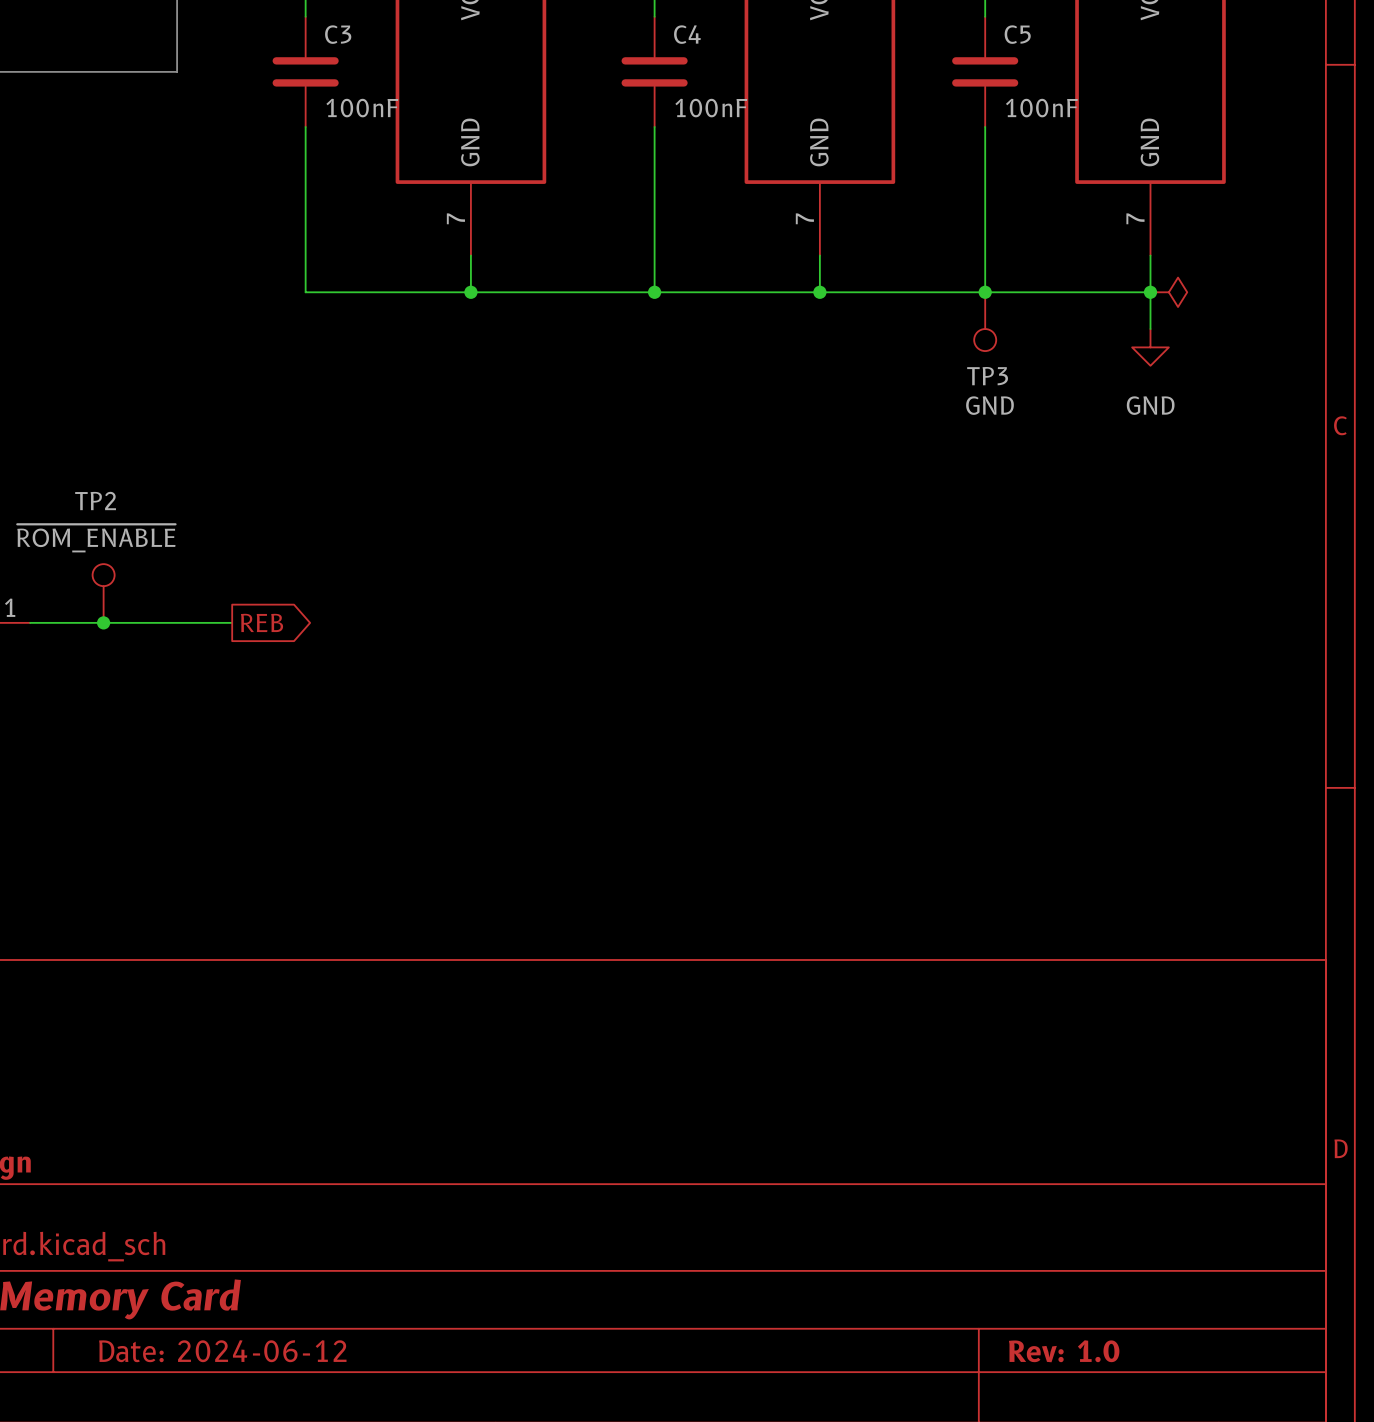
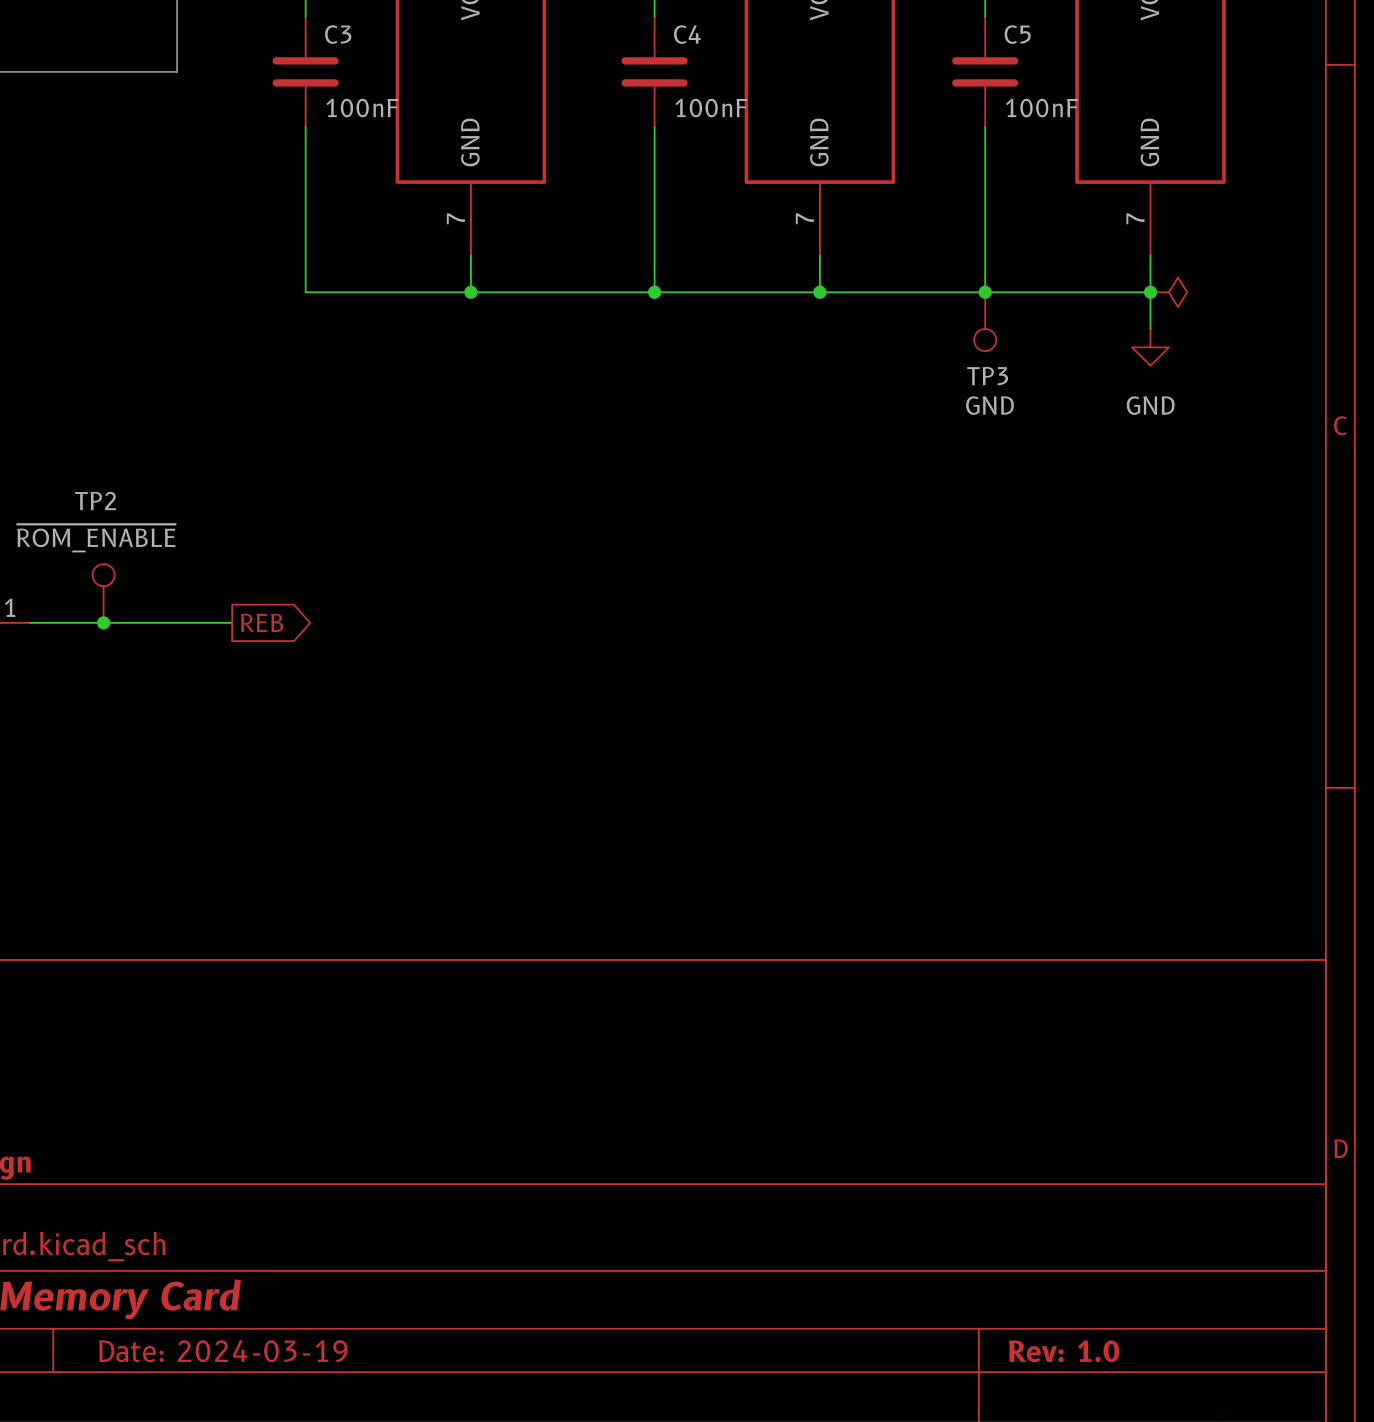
title block: Date: 2024-06-12 (222, 1351) -> Date: 2024-03-19 (223, 1351)

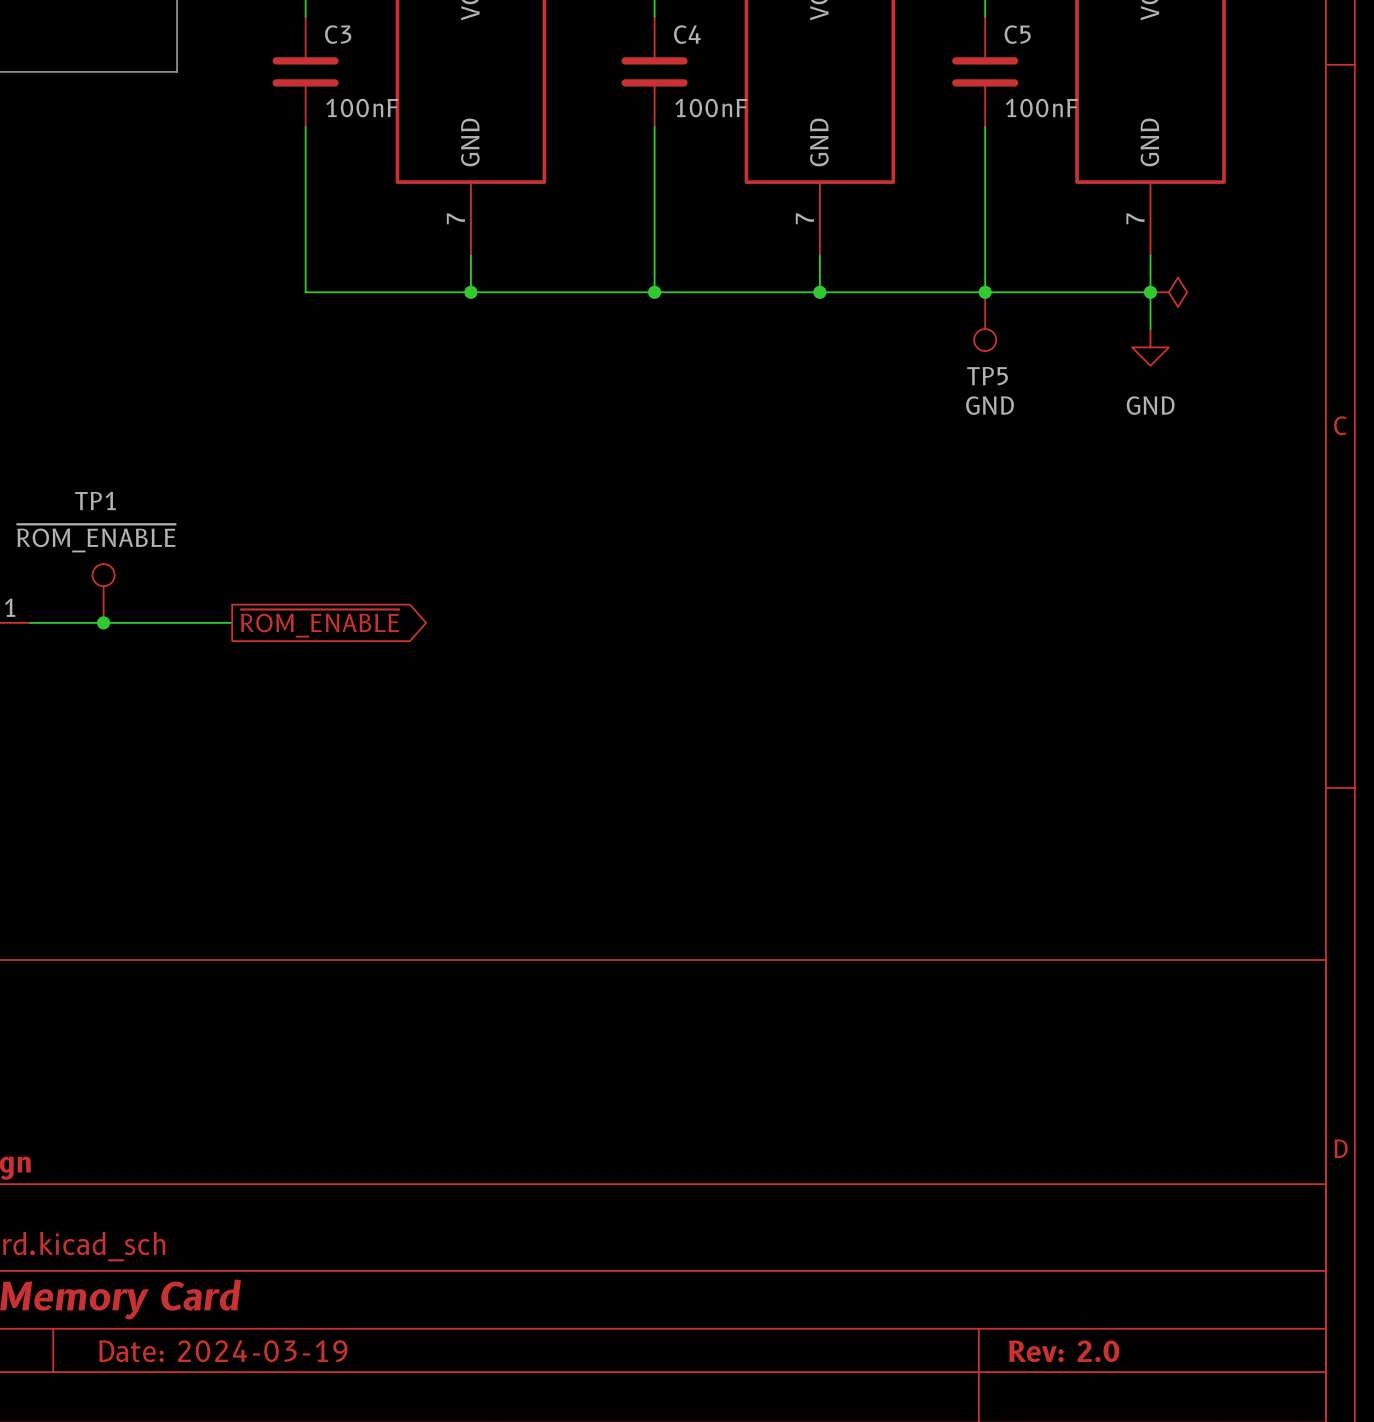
TP3 name: TP3 (987, 376) -> TP5 (987, 376)
TP2 name: TP2 (95, 501) -> TP1 (95, 500)
global label: REB (262, 622) -> ~{ROM_ENABLE} (320, 623)
title block: Rev: 1.0 (1064, 1351) -> Rev: 2.0 (1064, 1351)

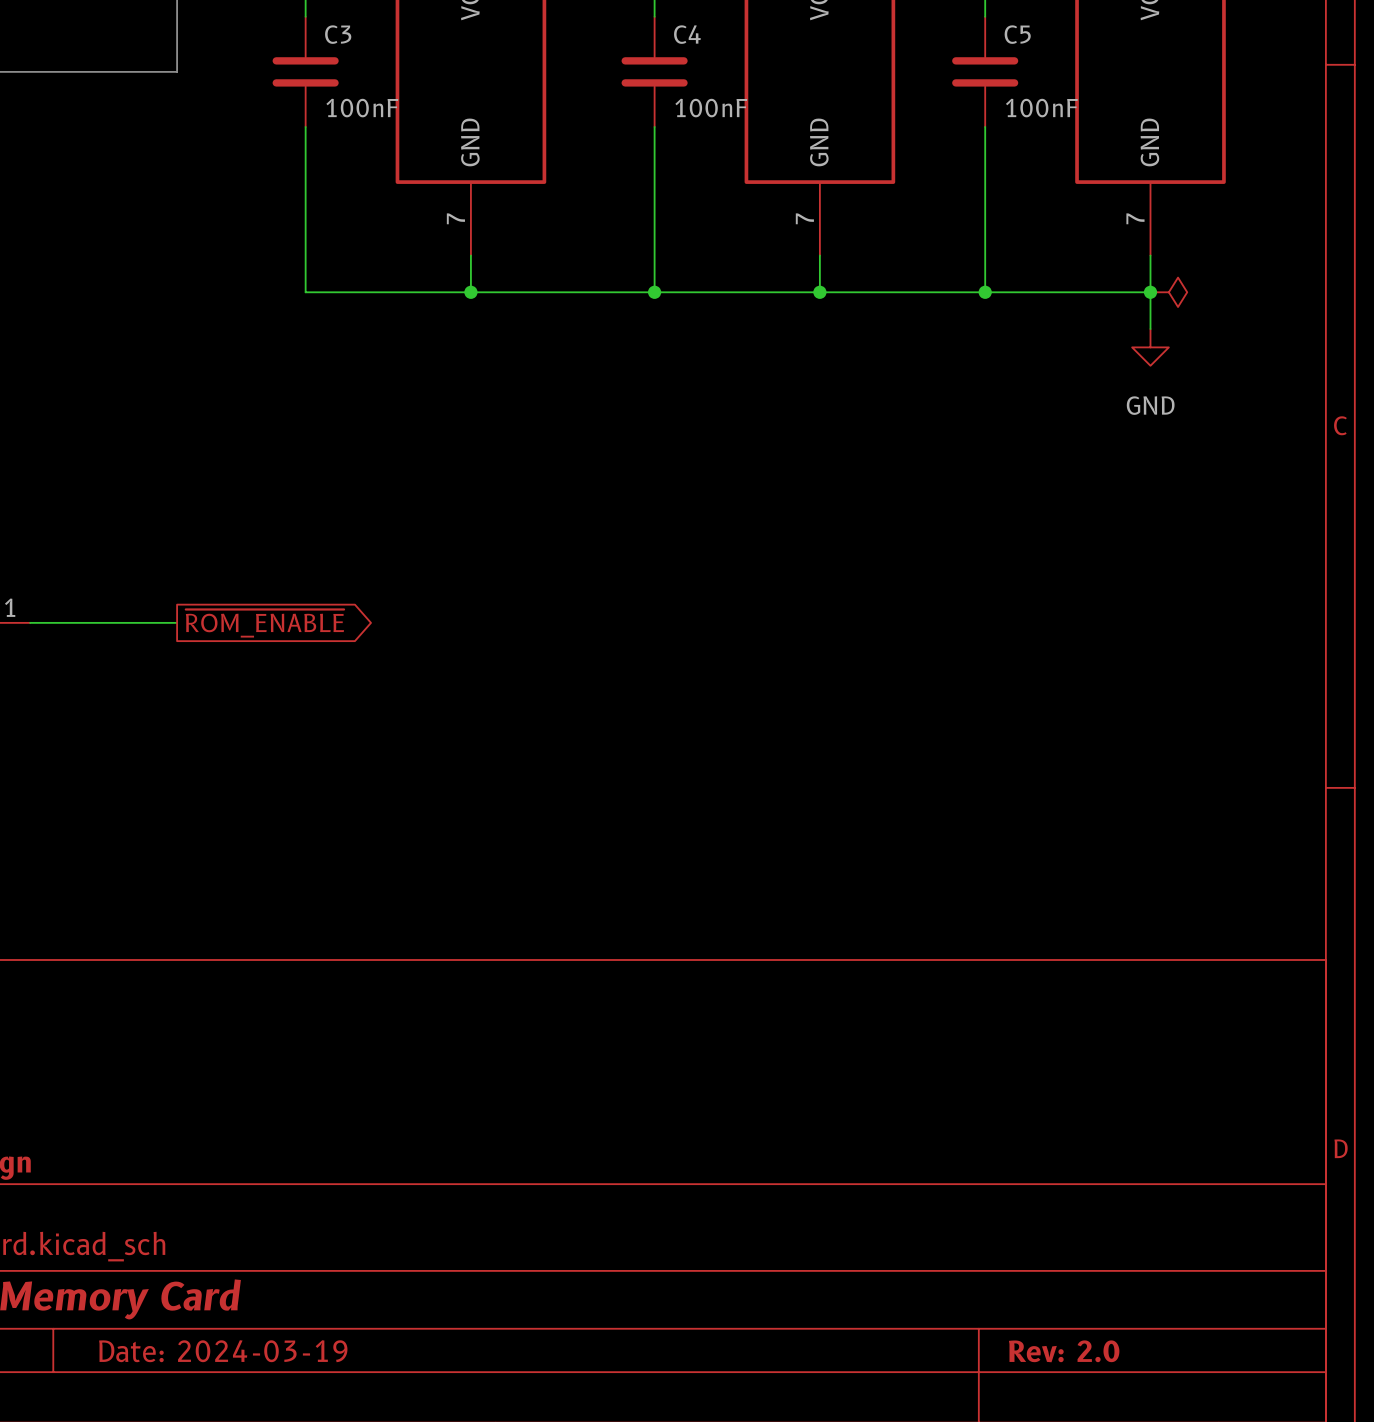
TP5: GND (985, 321) -> none
TP1: ~{ROM_ENABLE} (103, 593) -> none
junction: (103, 622) -> none
wire: (177, 622) (232, 622) -> none
global label position: ~{ROM_ENABLE} (320, 623) -> ~{ROM_ENABLE} (264, 623)

